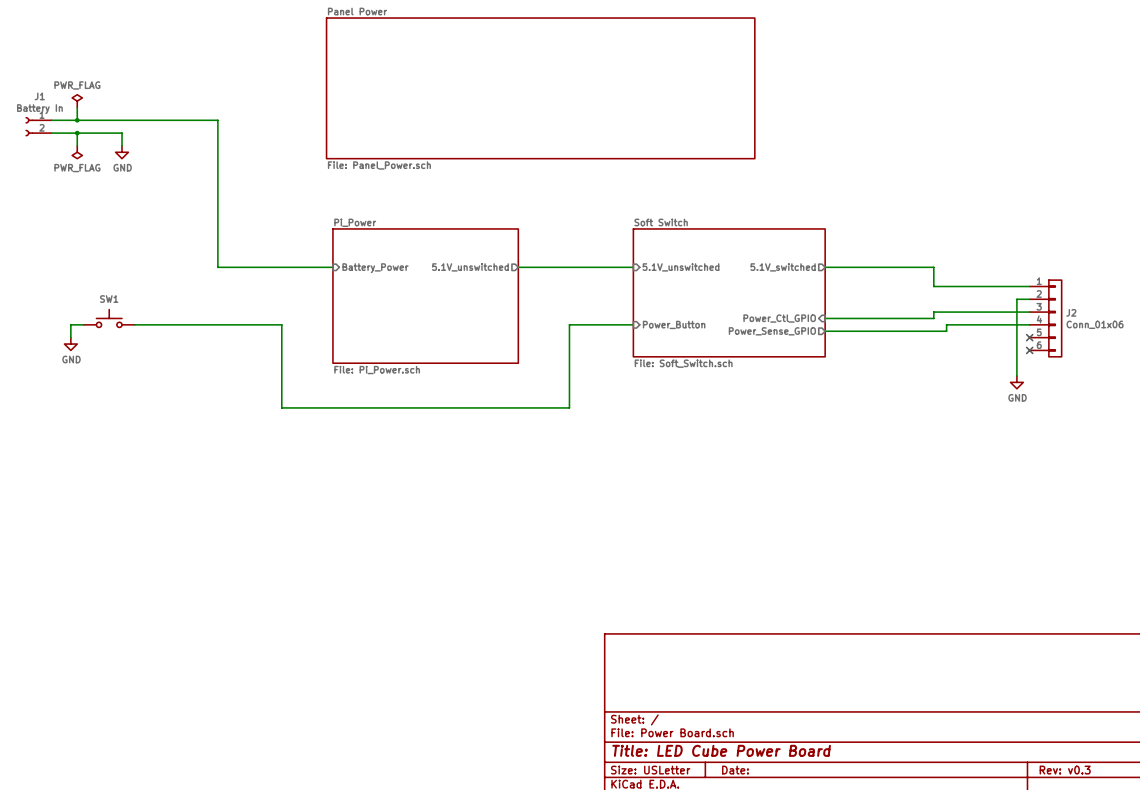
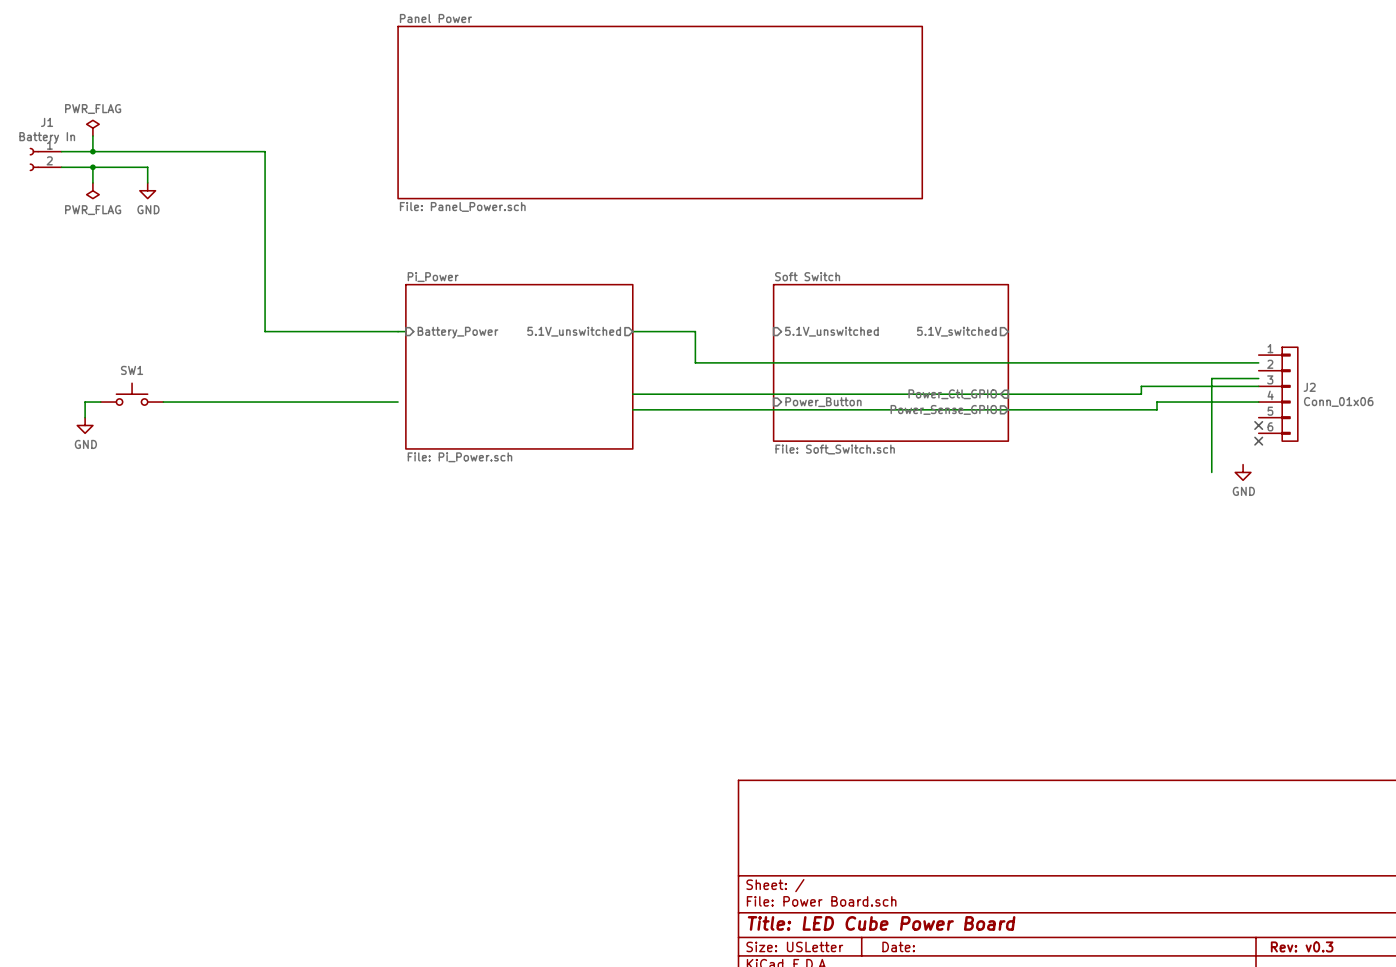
wire: (569, 267) (633, 267) -> (695, 331) (695, 362) (1258, 362)
wire: (825, 267) (933, 267) (933, 286) (1029, 286) -> none
wire: (1029, 299) (1016, 299) (1016, 375) -> none
wire: none -> (1258, 378) (1211, 378) (1211, 472)
wire: none -> (632, 394) (1008, 394)
wire: (281, 324) (281, 407) (569, 407) (569, 324) (633, 324) -> (343, 402) (398, 402)
wire: none -> (632, 409) (1008, 409)
no-connect mark: (1029, 337) -> none
no-connect mark: none -> (1258, 425)
no-connect mark: (1029, 350) -> none
no-connect mark: none -> (1258, 441)

